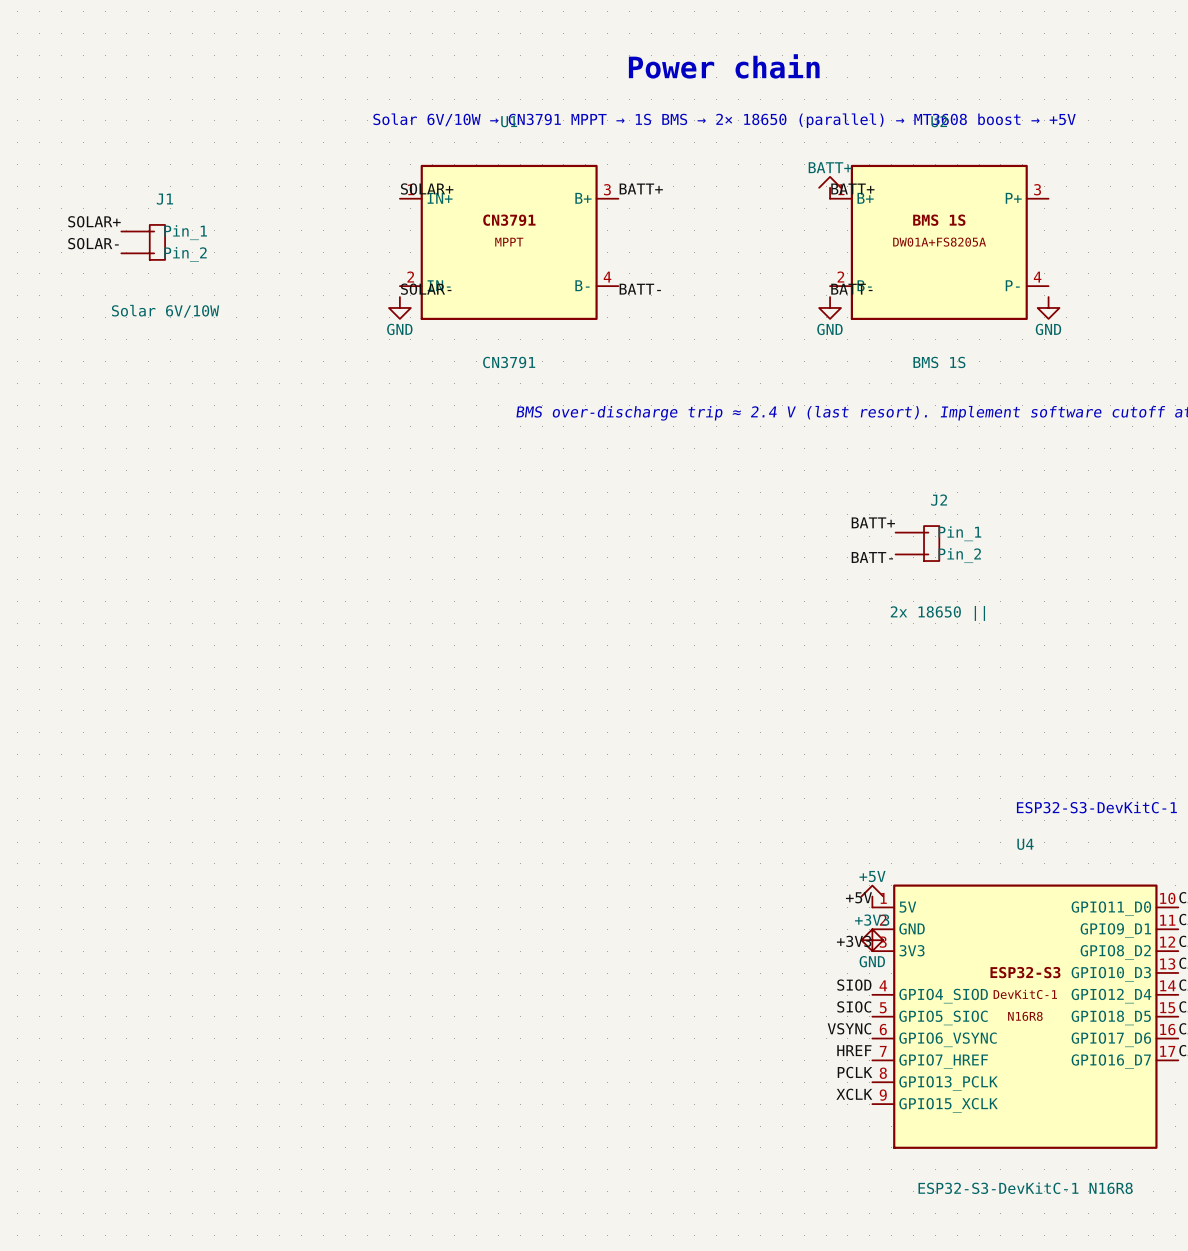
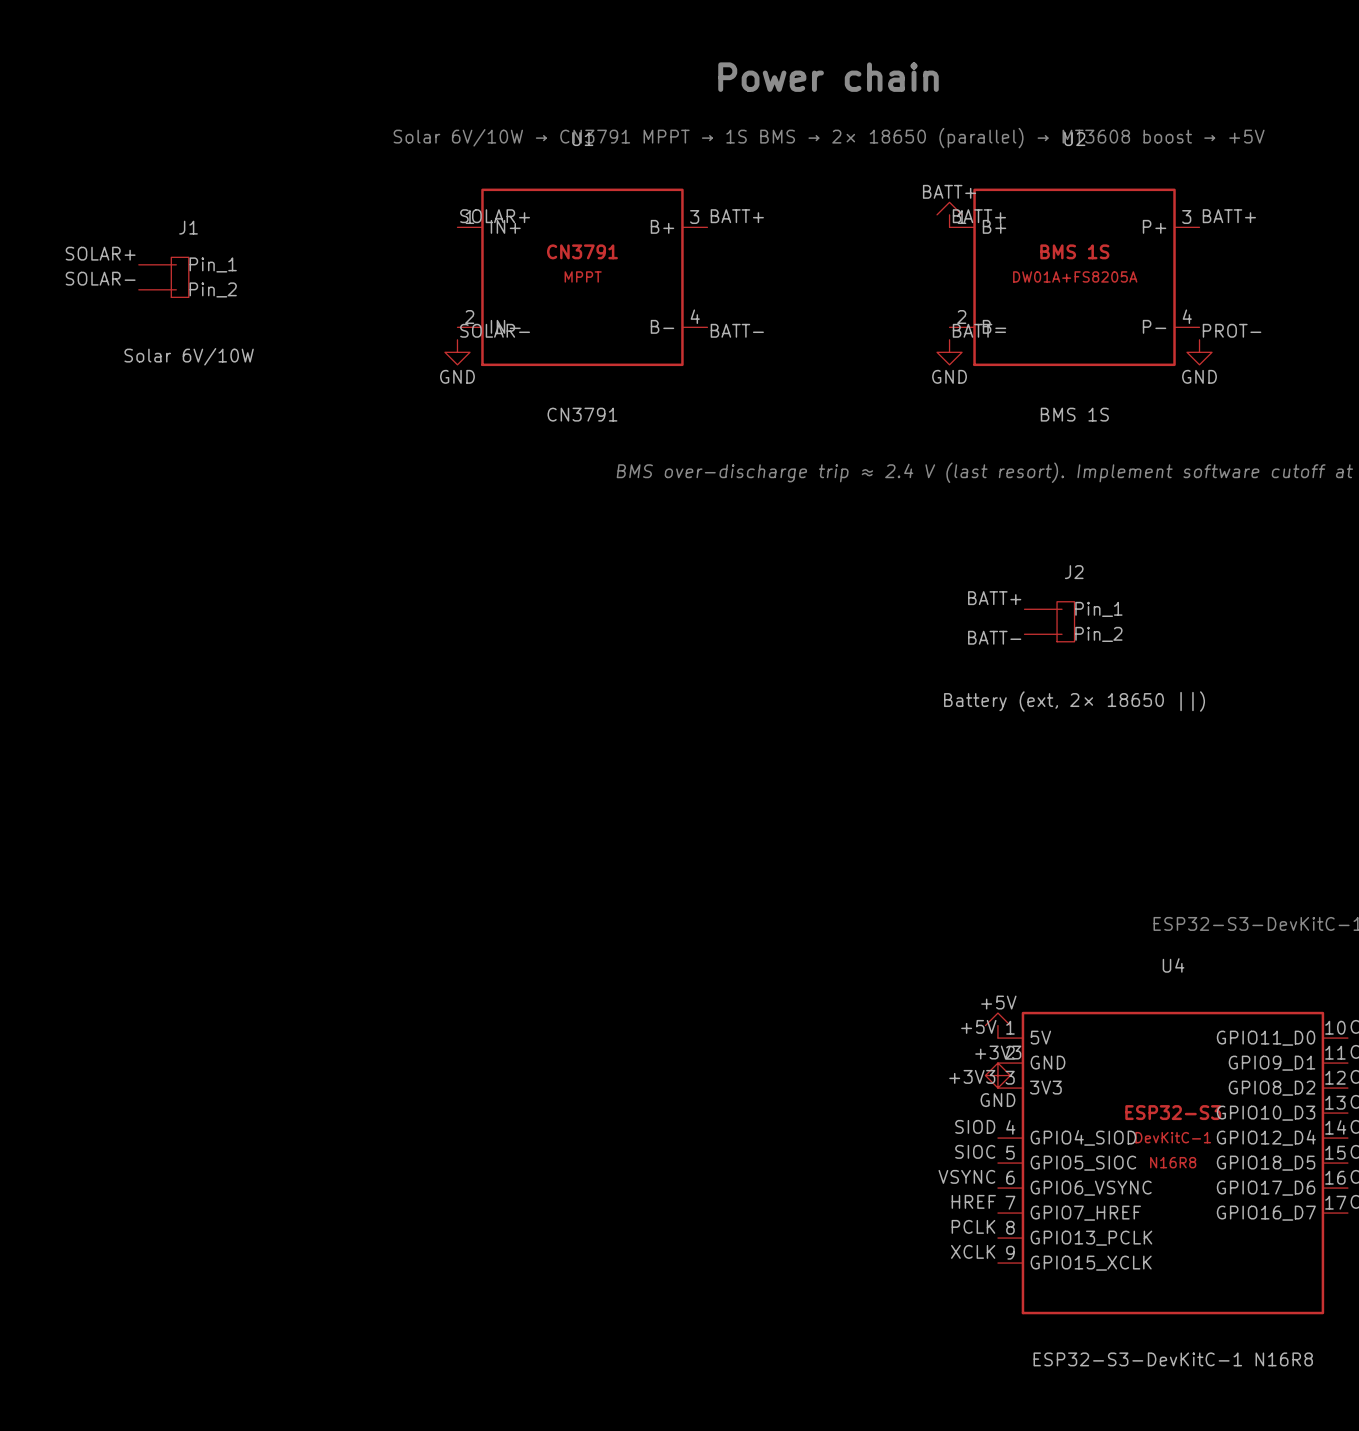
label: none -> BATT+ (1229, 216)
label: none -> PROT- (1232, 330)
J2 value: 2x 18650 || (937, 613) -> Battery (ext, 2× 18650 ||) (1074, 701)

